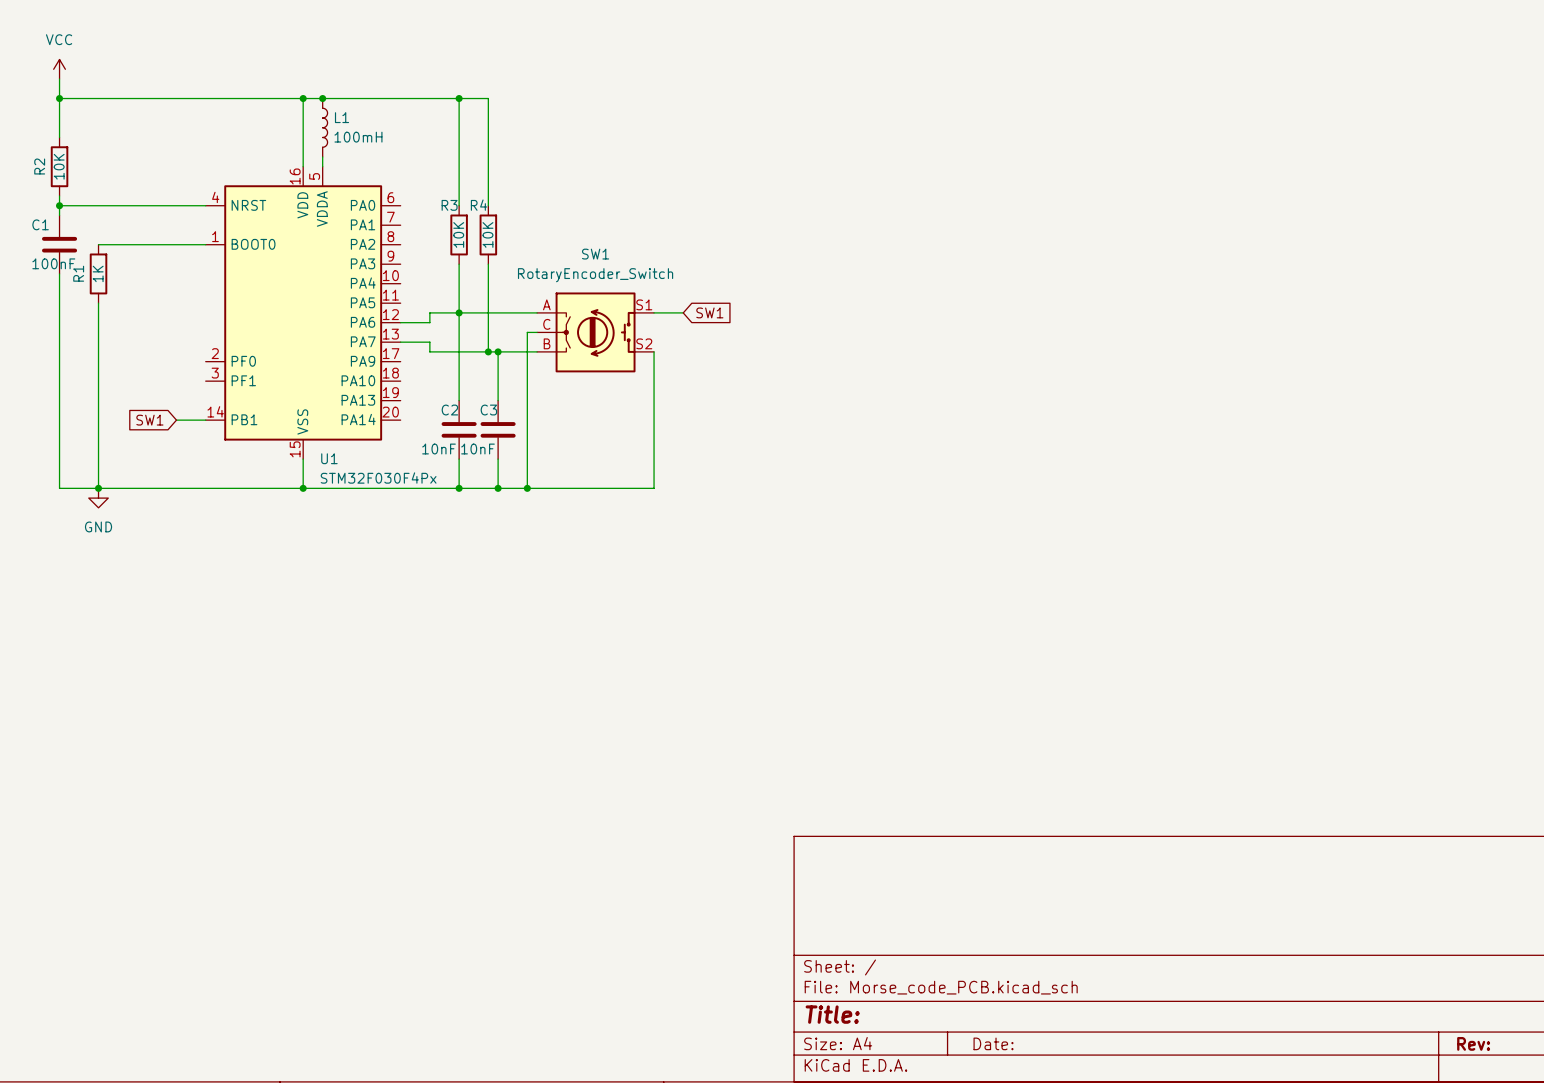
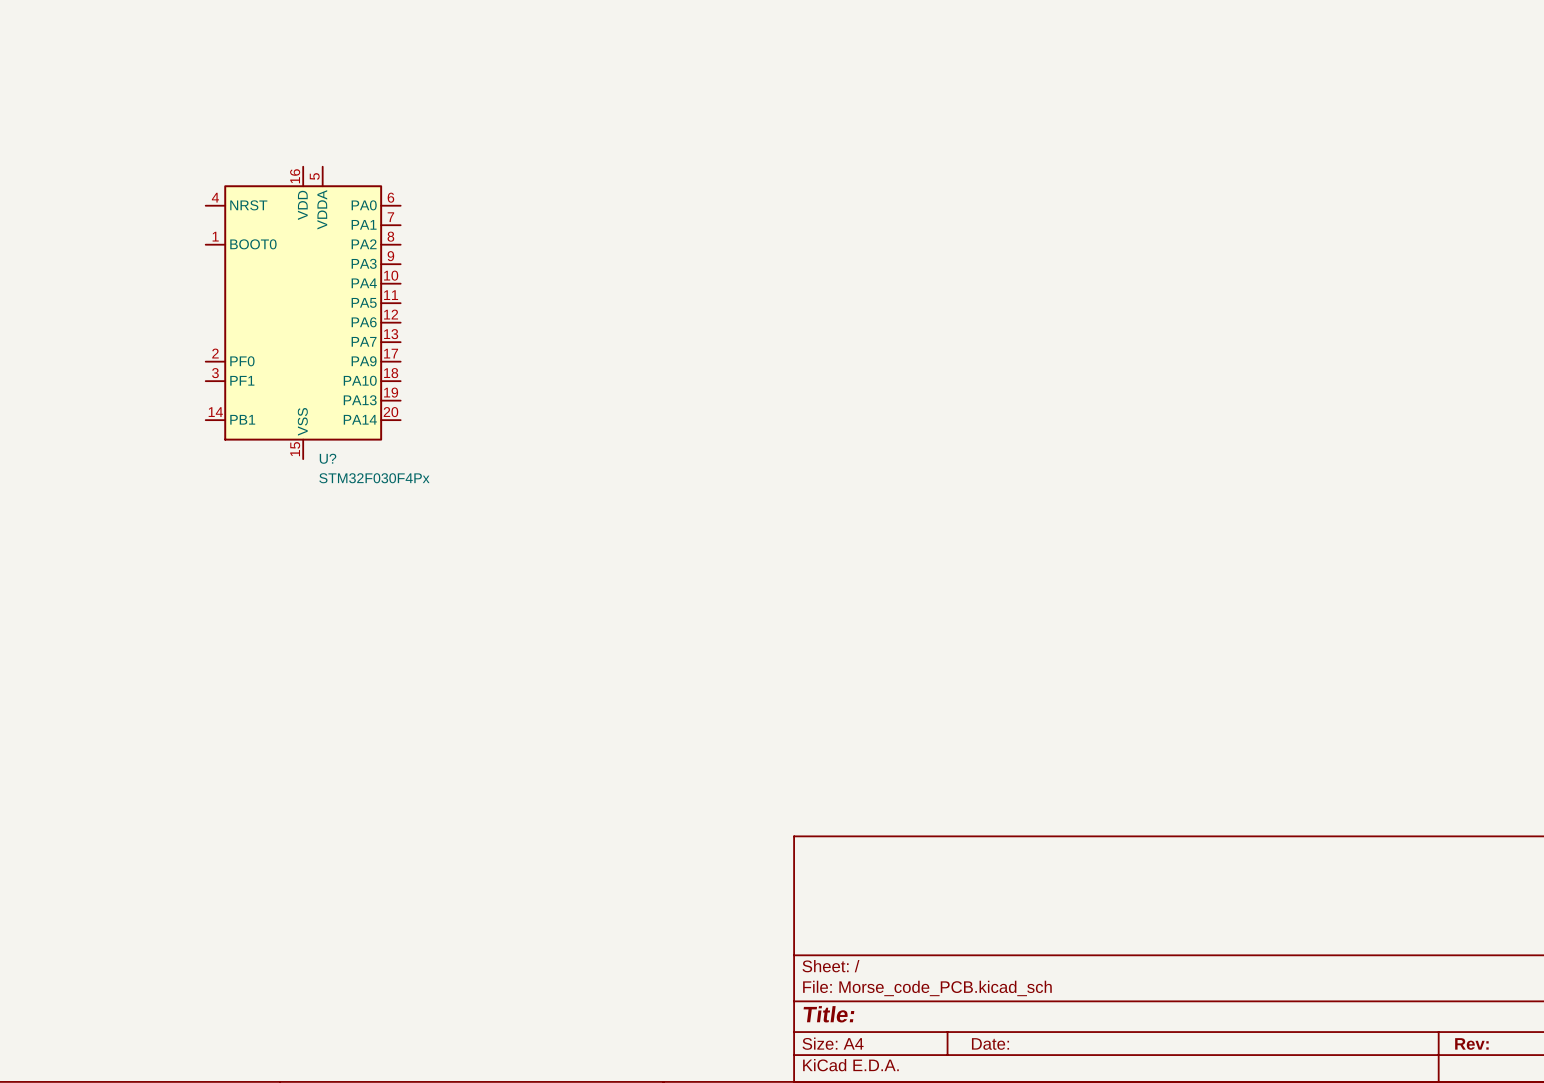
power symbol: VCC (59, 69) -> none
wire: (59, 79) (59, 137) -> none
wire: (59, 98) (488, 98) (488, 205) -> none
junction: (59, 98) -> none
wire: (303, 98) (303, 166) -> none
junction: (303, 98) -> none
junction: (322, 98) -> none
wire: (459, 98) (459, 205) -> none
junction: (459, 98) -> none
L1: 100mH (325, 127) -> none
wire: (322, 156) (322, 166) -> none
R2: 10K (59, 166) -> none
wire: (59, 195) (59, 215) -> none
wire: (59, 205) (205, 205) -> none
junction: (59, 205) -> none
R3: 10K (459, 234) -> none
R4: 10K (488, 234) -> none
C1: 100nF (59, 244) -> none
wire: (98, 244) (205, 244) -> none
wire: (459, 264) (459, 400) -> none
wire: (488, 264) (488, 351) -> none
wire: (59, 273) (59, 488) (654, 488) (654, 351) -> none
R1: 1K (98, 273) -> none
wire: (98, 303) (98, 488) -> none
junction: (459, 312) -> none
wire: (537, 312) (429, 312) (429, 322) (400, 322) -> none
wire: (654, 312) (683, 312) -> none
global label: SW1 (709, 312) -> none
wire: (537, 332) (527, 332) (527, 488) -> none
SW1: RotaryEncoder_Switch (595, 332) -> none
wire: (400, 342) (429, 342) (429, 351) (537, 351) -> none
junction: (488, 351) -> none
wire: (498, 351) (498, 400) -> none
junction: (498, 351) -> none
global label: SW1 (149, 420) -> none
wire: (176, 420) (205, 420) -> none
C2: 10nF (459, 429) -> none
C3: 10nF (498, 429) -> none
U1 name: U1 (329, 458) -> U? (328, 458)
wire: (303, 459) (303, 488) -> none
wire: (459, 459) (459, 488) -> none
wire: (498, 459) (498, 488) -> none
junction: (98, 488) -> none
junction: (303, 488) -> none
junction: (459, 488) -> none
junction: (498, 488) -> none
junction: (527, 488) -> none
power symbol: GND (98, 498) -> none

